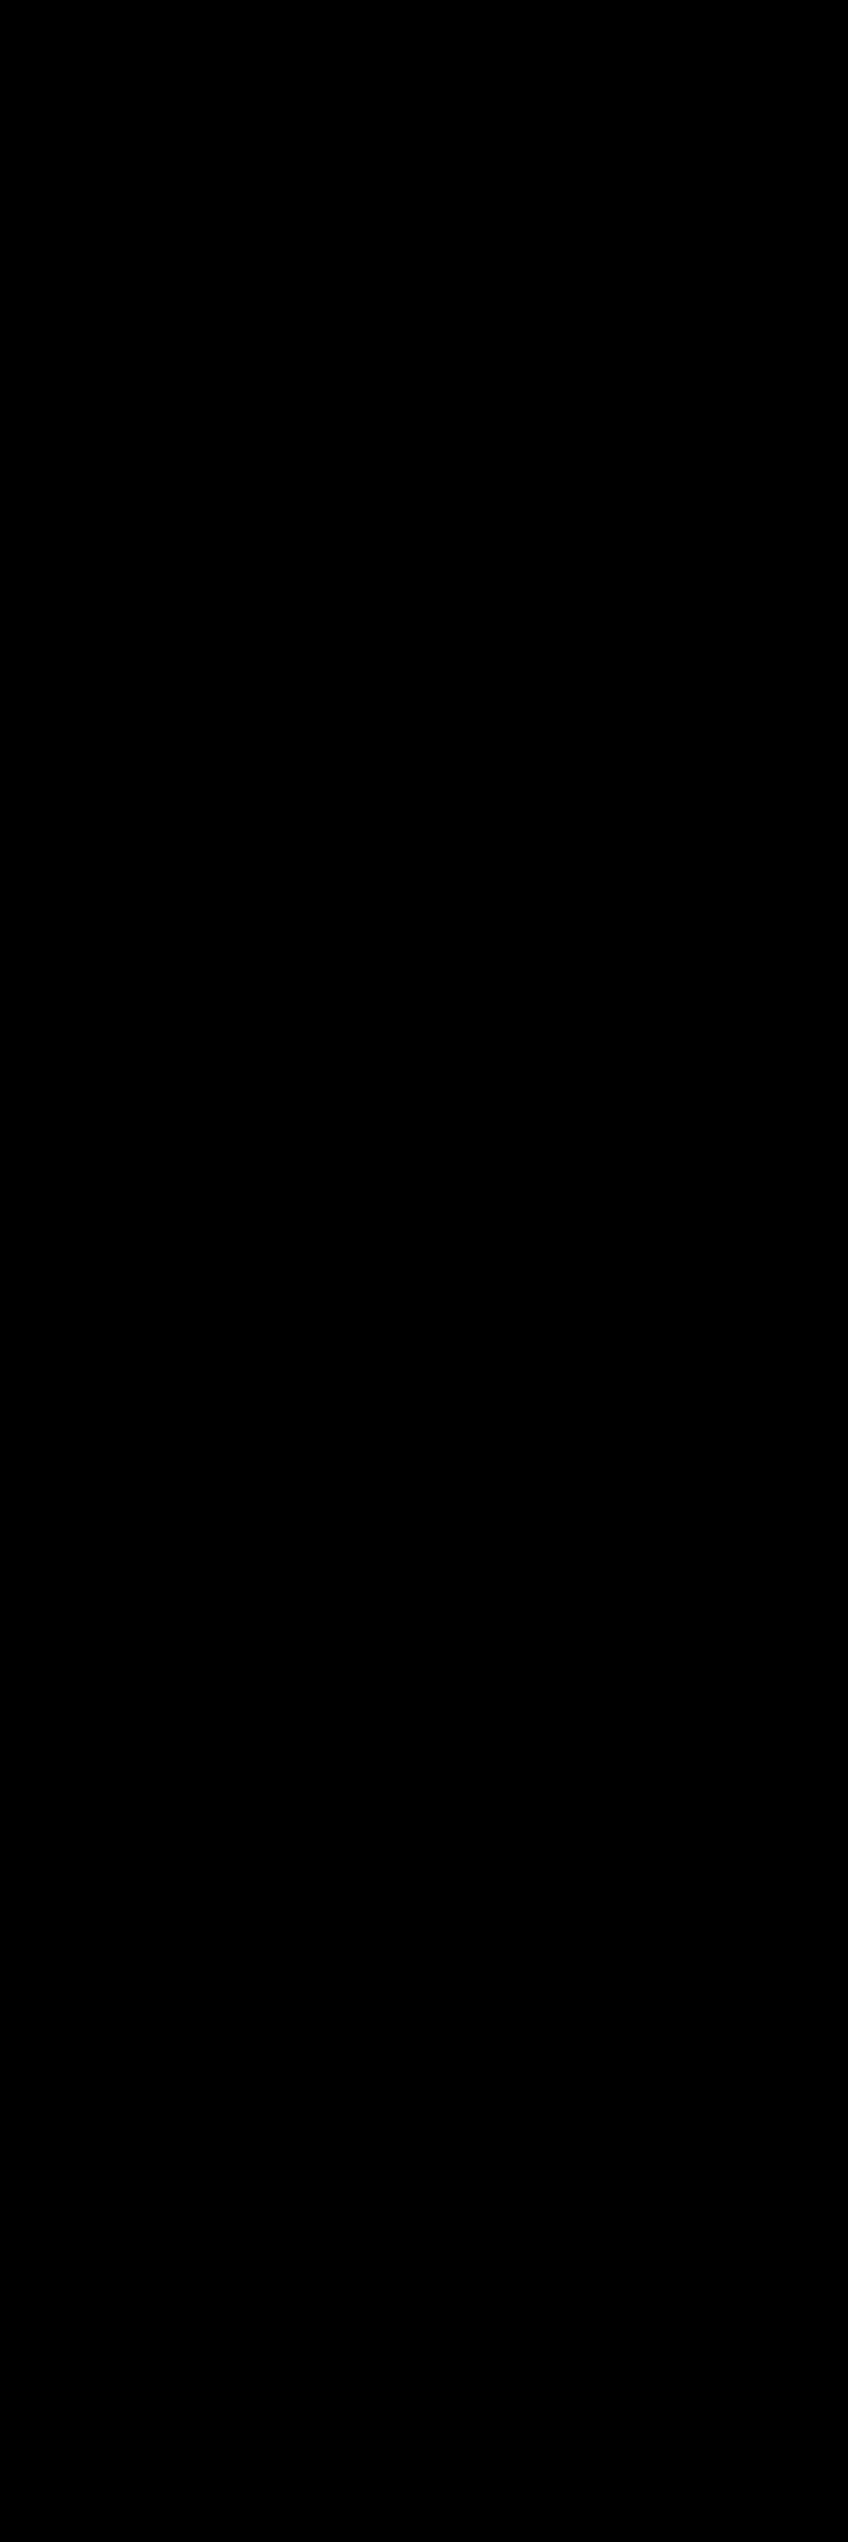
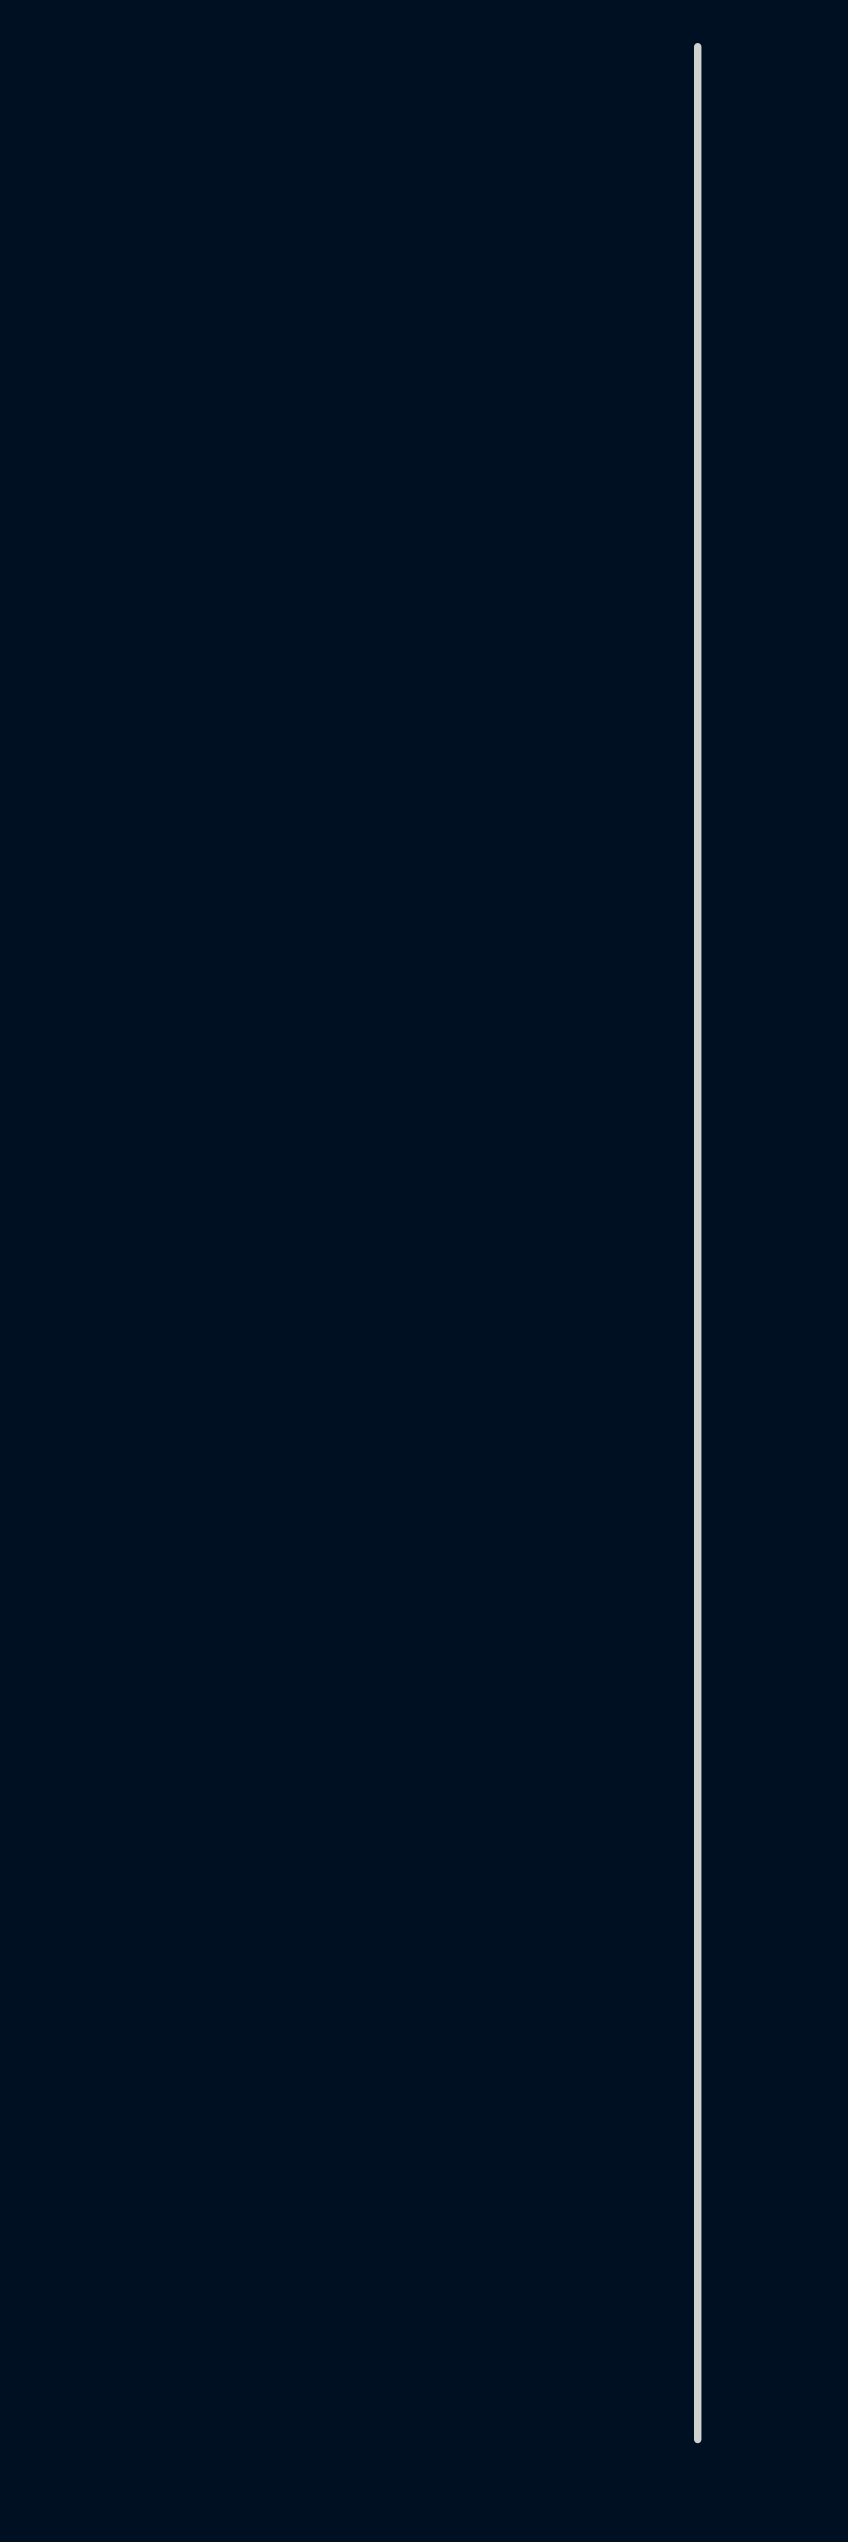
board edge: none -> (697, 46) (697, 2439)

